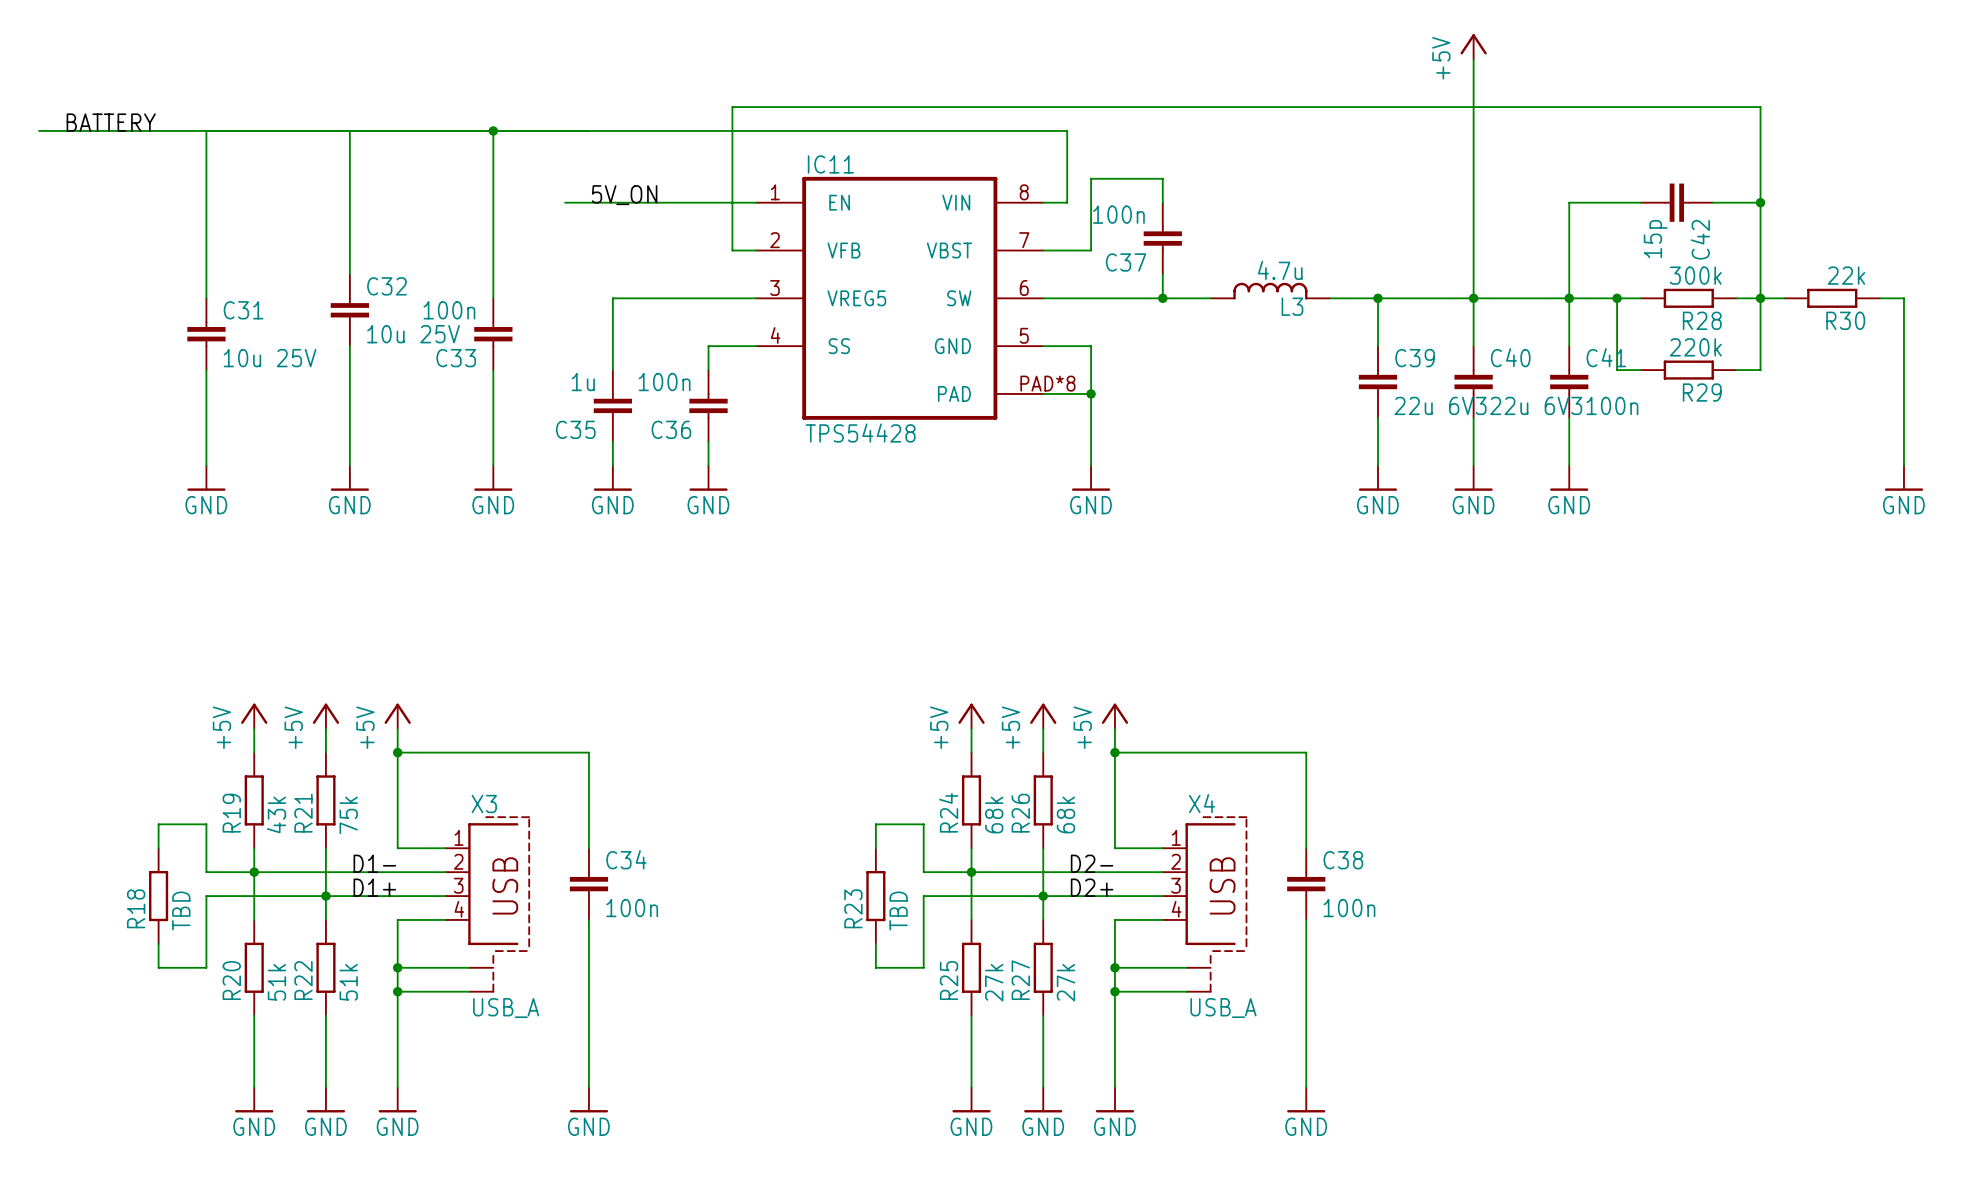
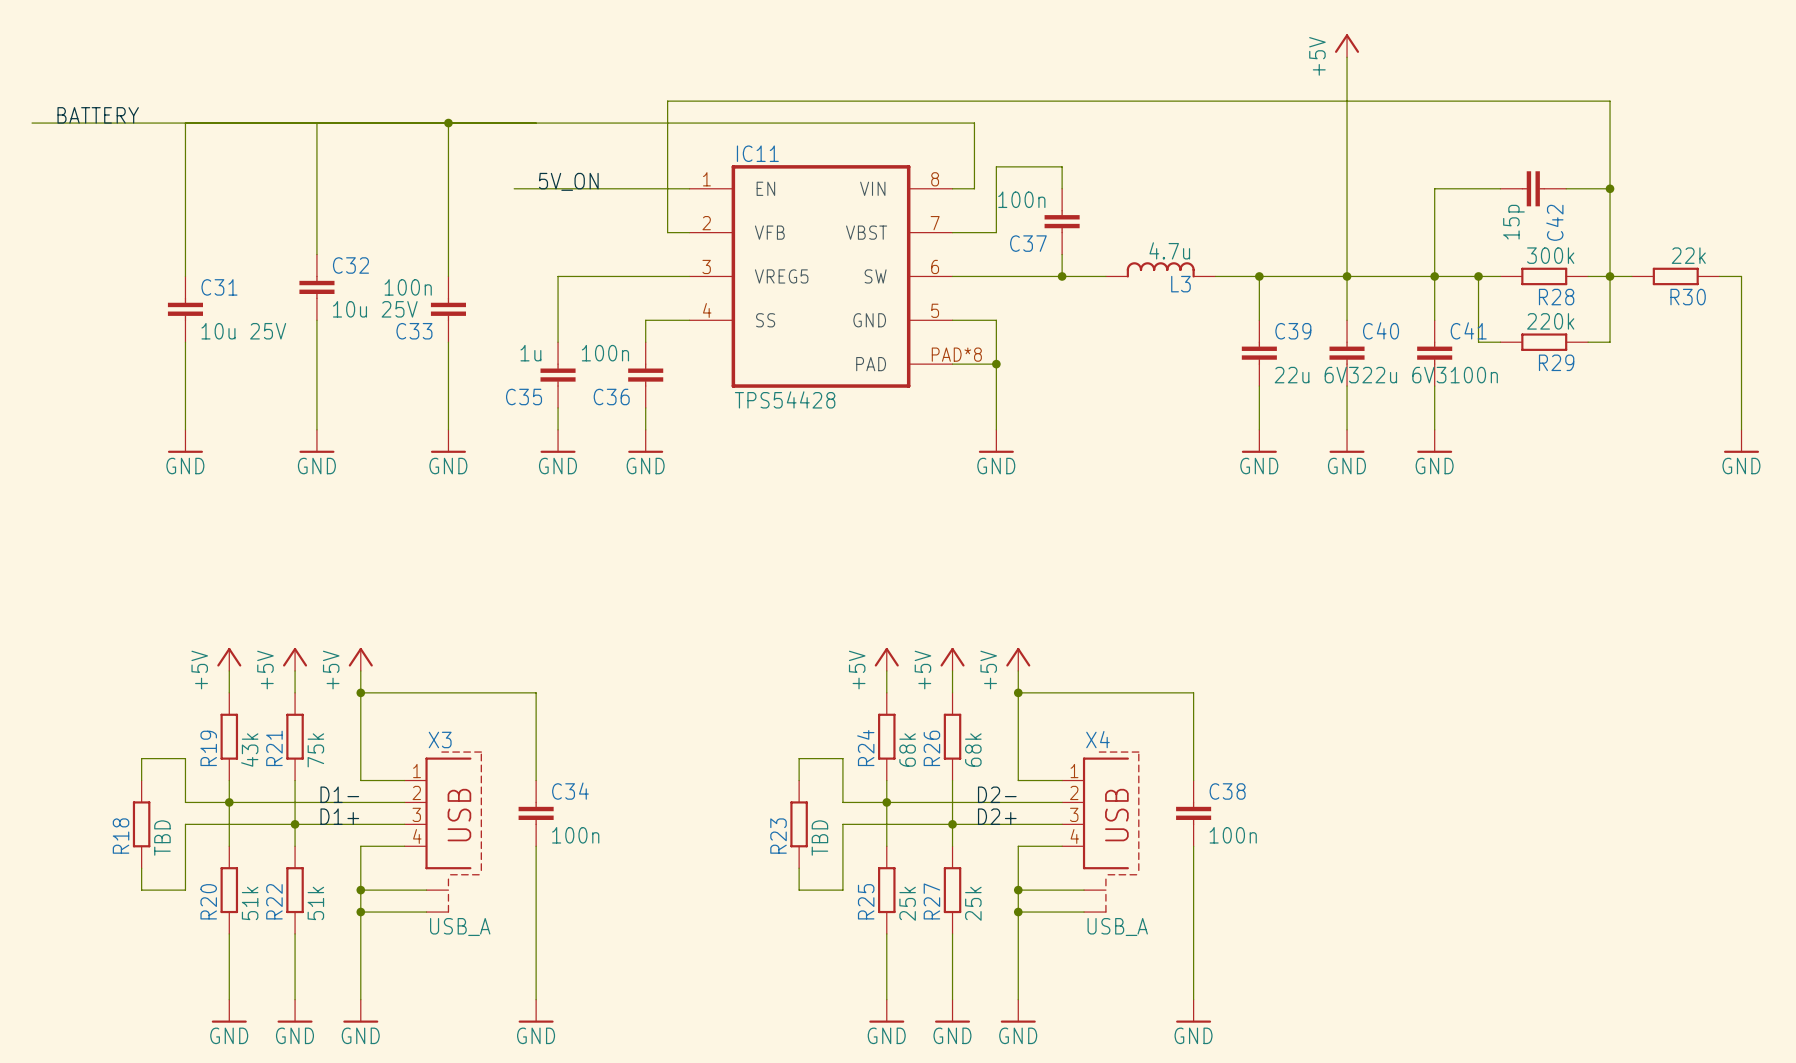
R25 value: 27k (994, 982) -> 25k (907, 903)
R27 value: 27k (1065, 982) -> 25k (973, 903)

